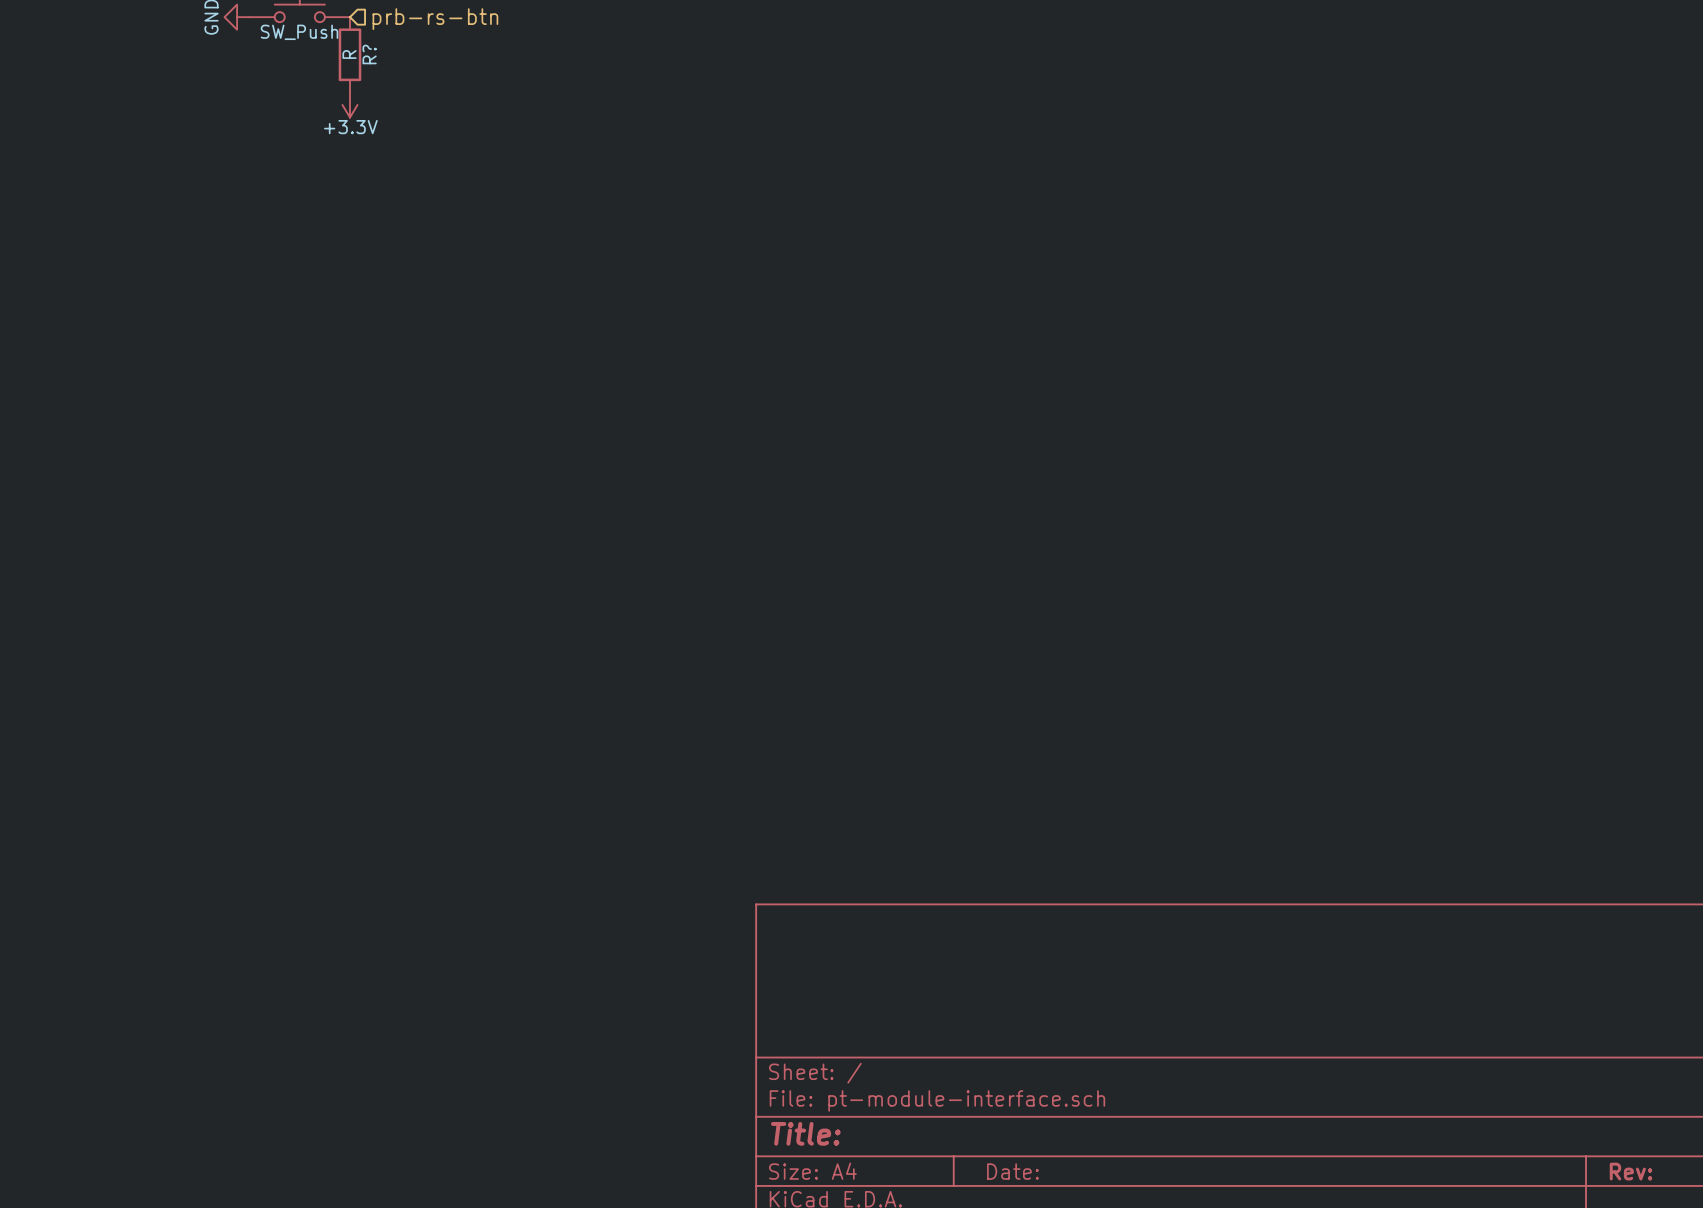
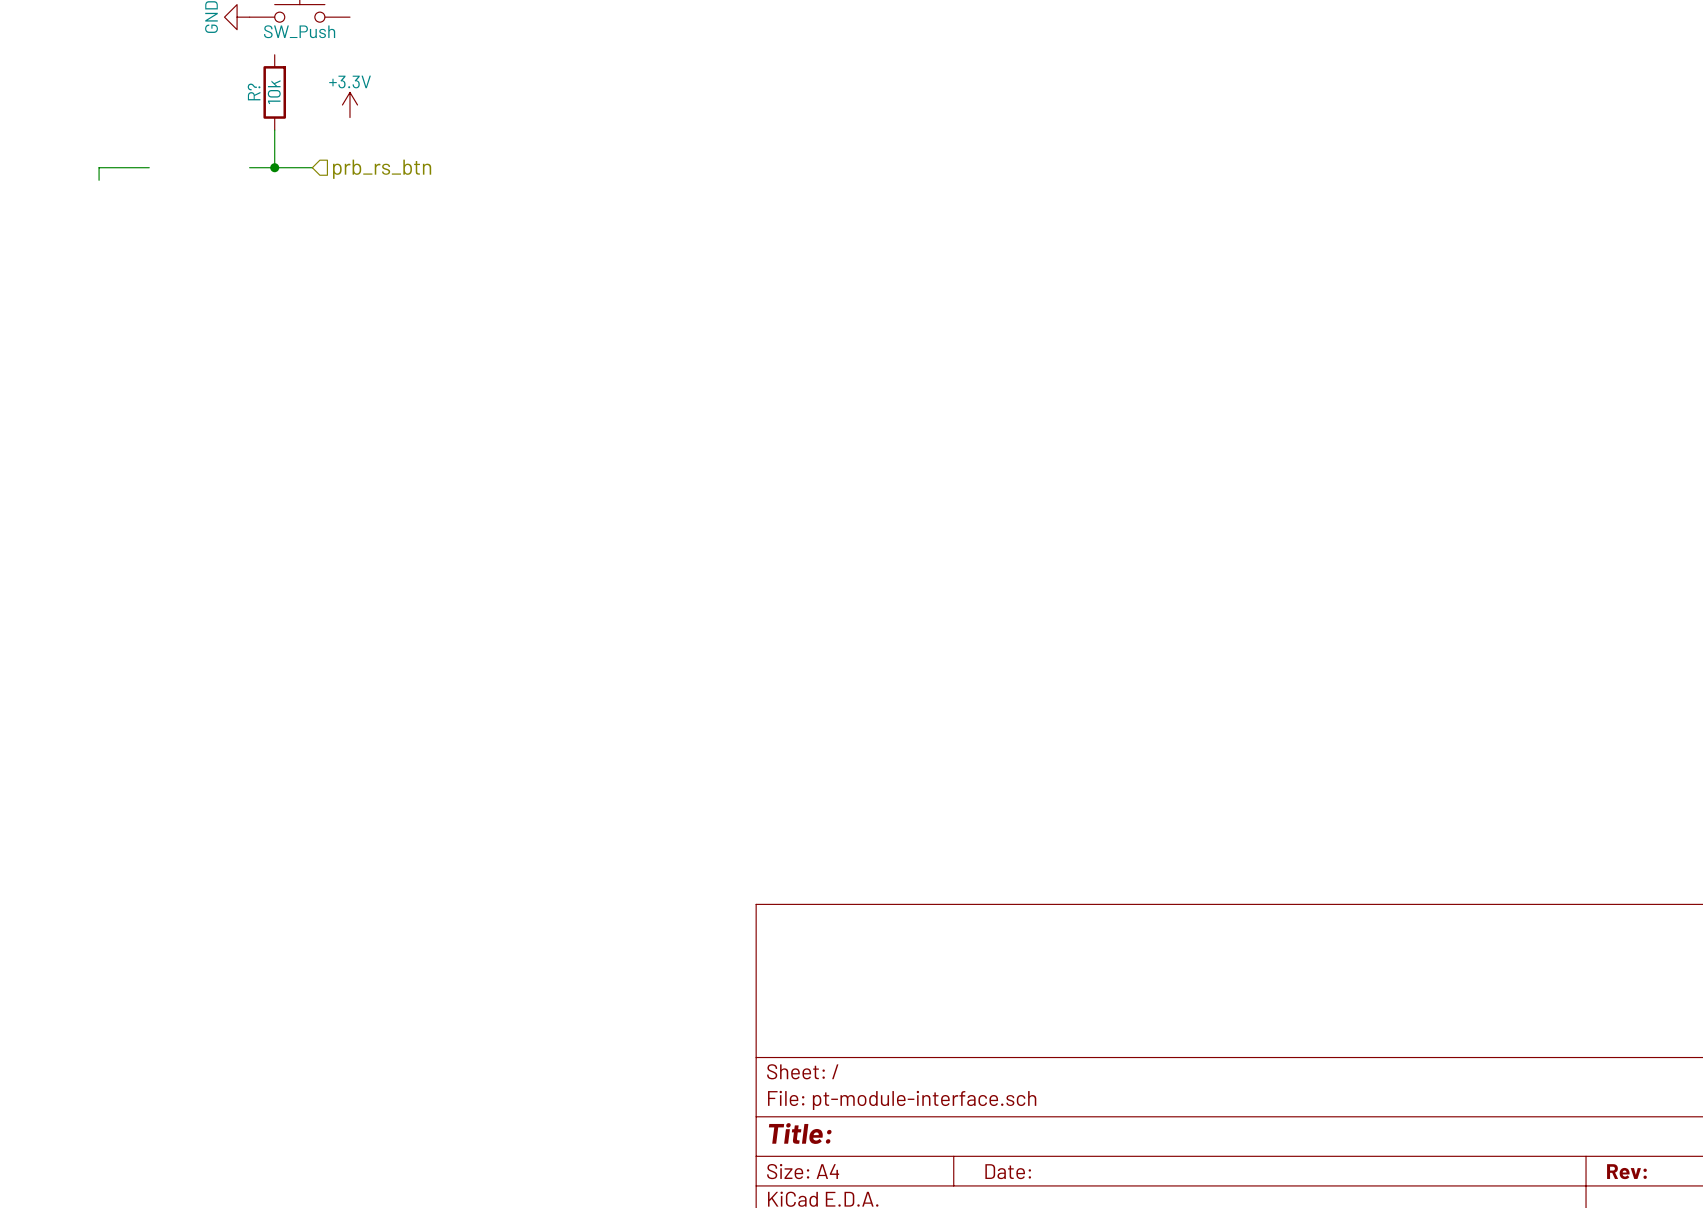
hierarchical label: prb-rs-btn (435, 19) -> none
R?: R (349, 54) -> none
R?: none -> 10k (274, 92)
power symbol rotation: 0° (349, 104) -> 180° (349, 104)
wire: none -> (274, 130) (274, 167)
wire: none -> (149, 167) (99, 167) (99, 180)
wire: none -> (249, 167) (312, 167)
junction: none -> (274, 167)
hierarchical label: none -> prb_rs_btn (382, 169)

